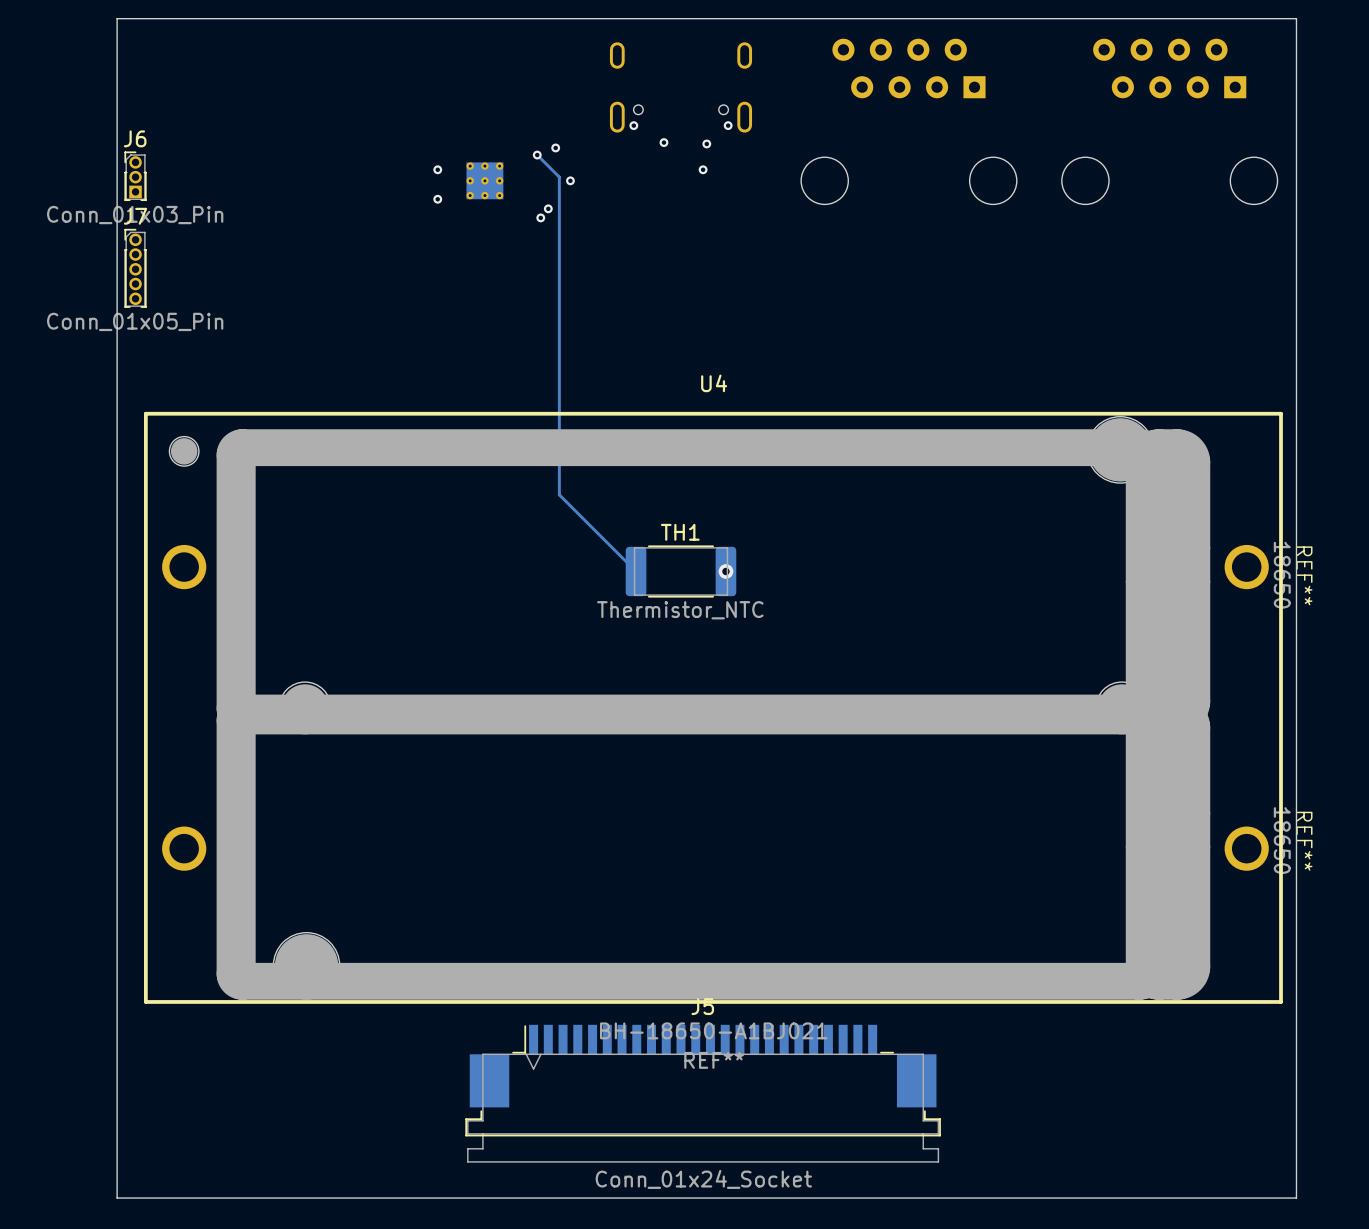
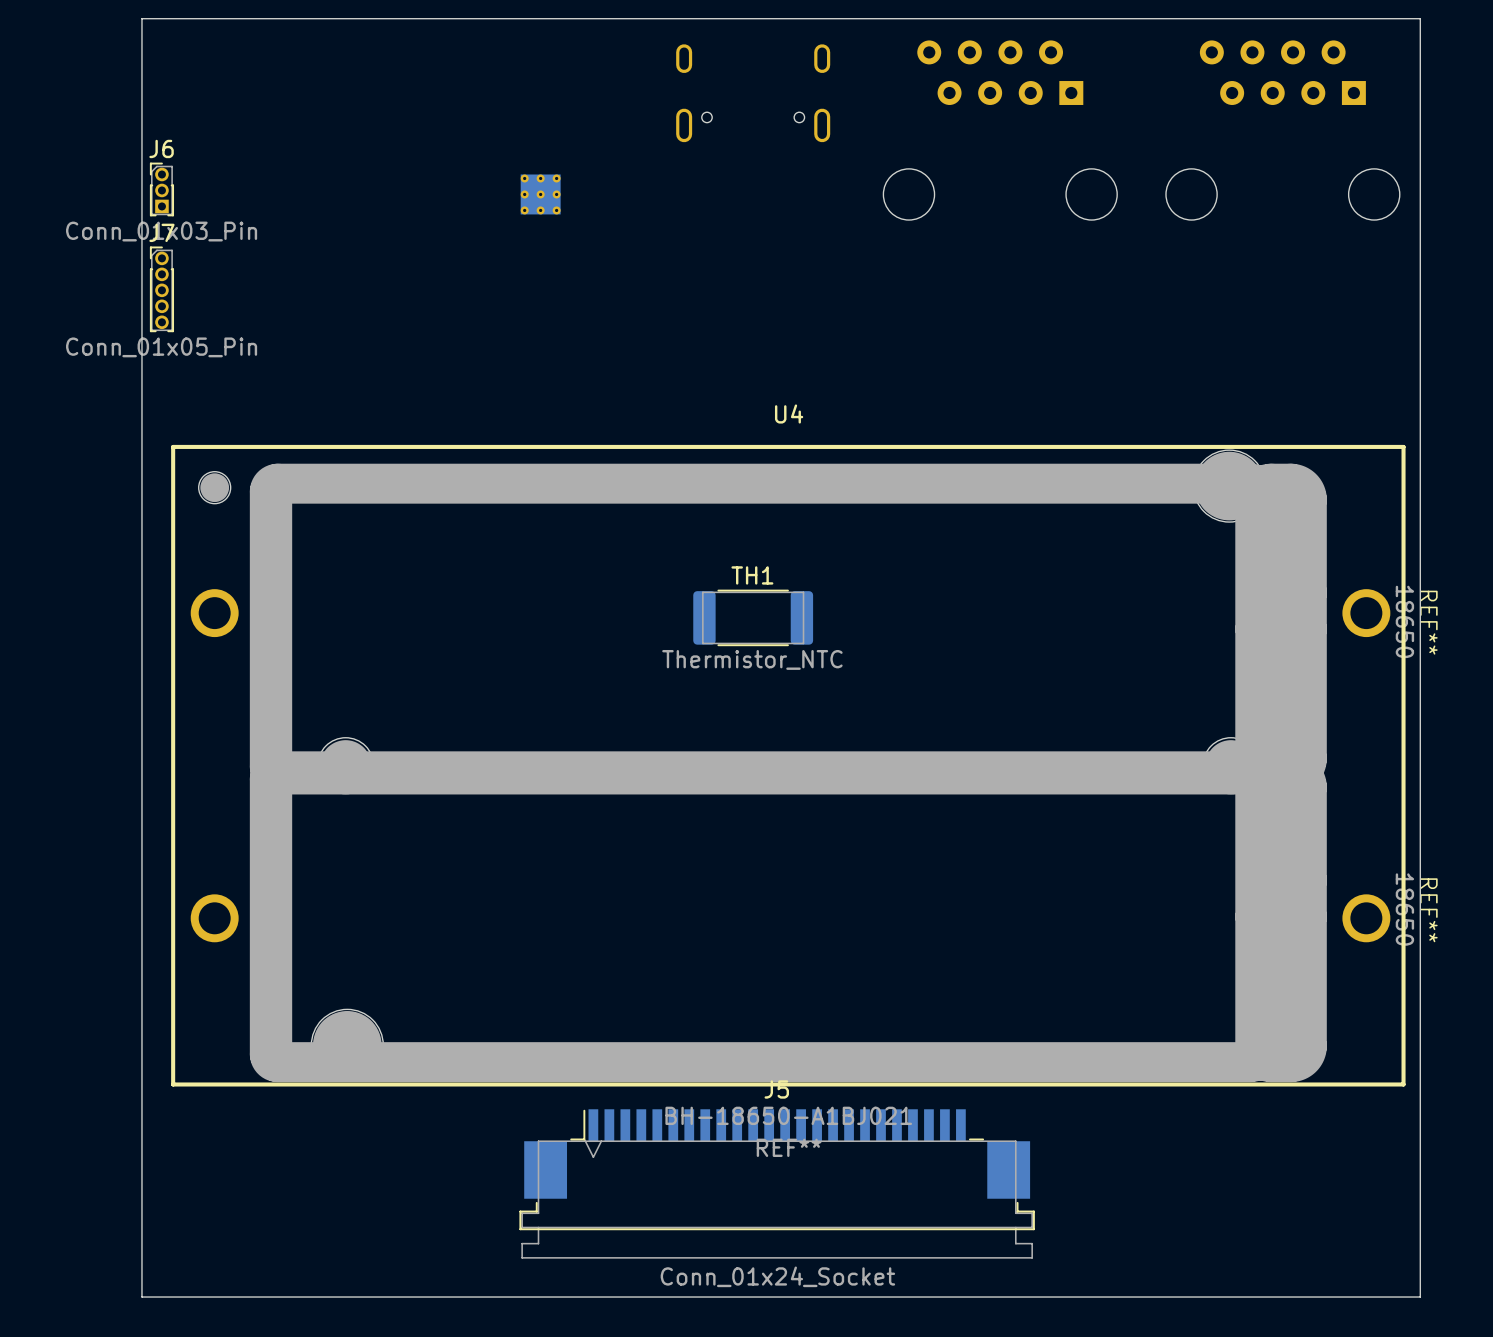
via: (633, 125) -> none
via: (728, 125) -> none
via: (663, 142) -> none
via: (706, 143) -> none
via: (555, 147) -> none
track: (537, 155) (559, 177) (559, 494) (636, 571) -> none
via: (537, 155) -> none
via: (437, 169) -> none
via: (703, 169) -> none
via: (570, 180) -> none
via: (437, 199) -> none
via: (548, 208) -> none
via: (540, 217) -> none
via: (725, 571) -> none

